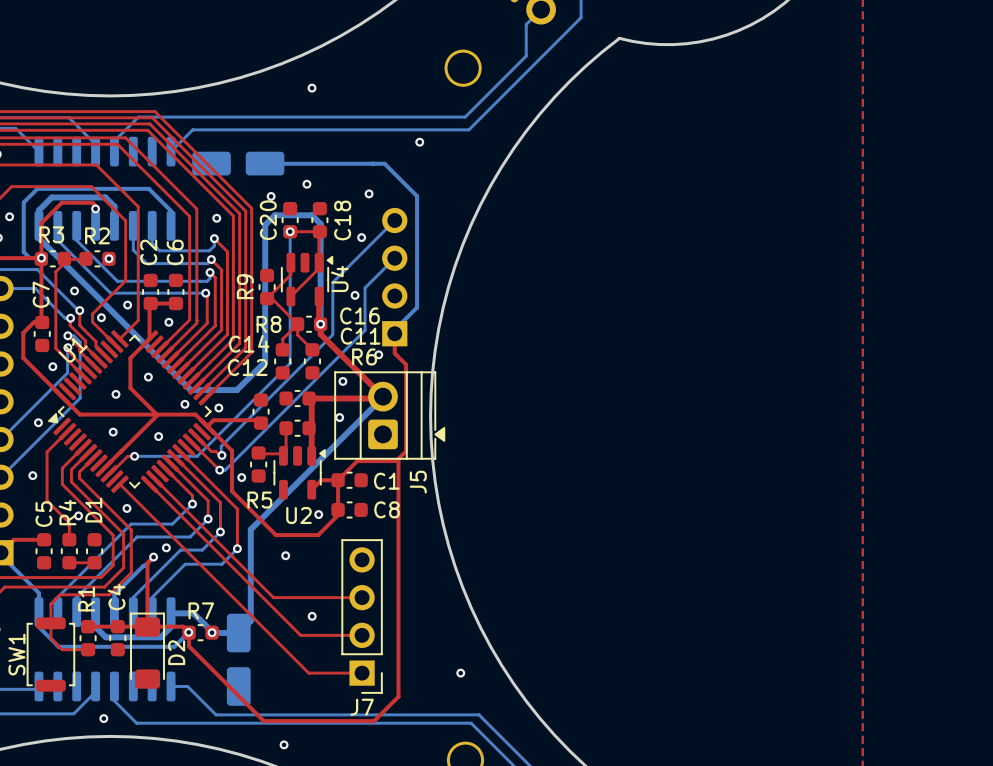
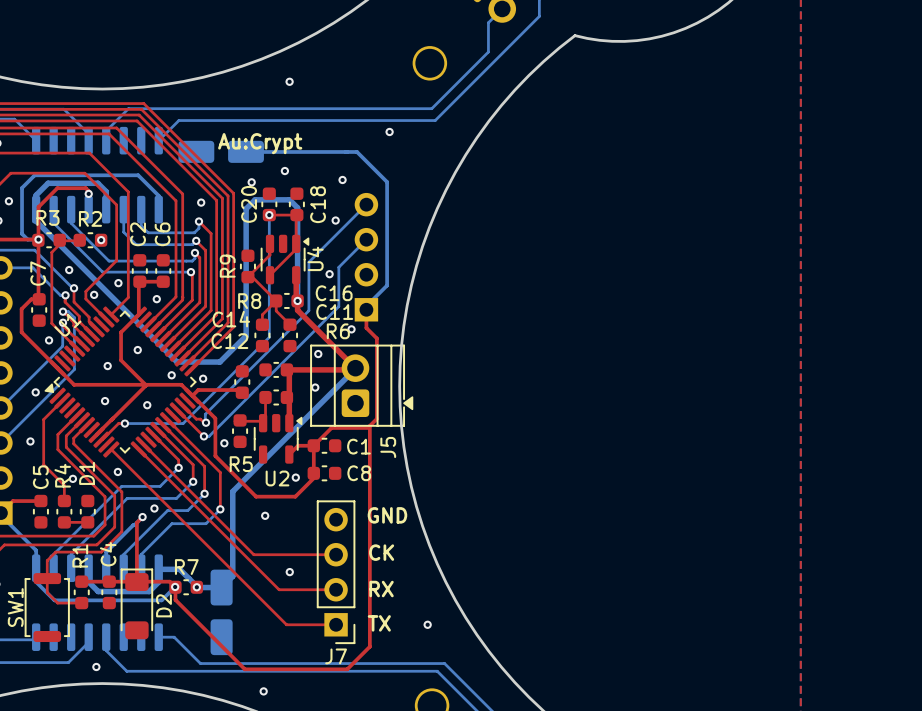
text: none -> Au:Crypt (260, 143)
text: none -> GND (387, 515)
text: none -> CK (381, 552)
text: none -> RX (381, 589)
text: none -> TX (379, 623)

